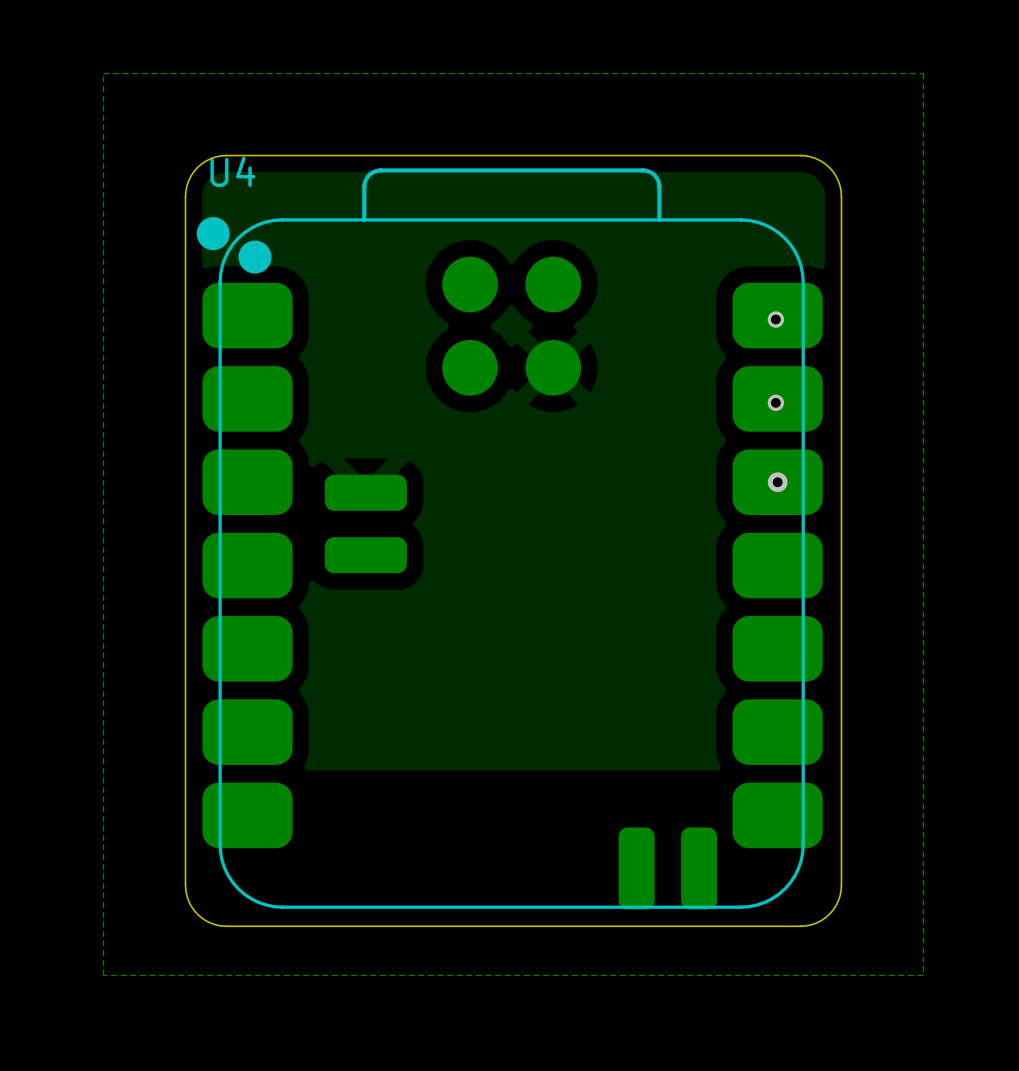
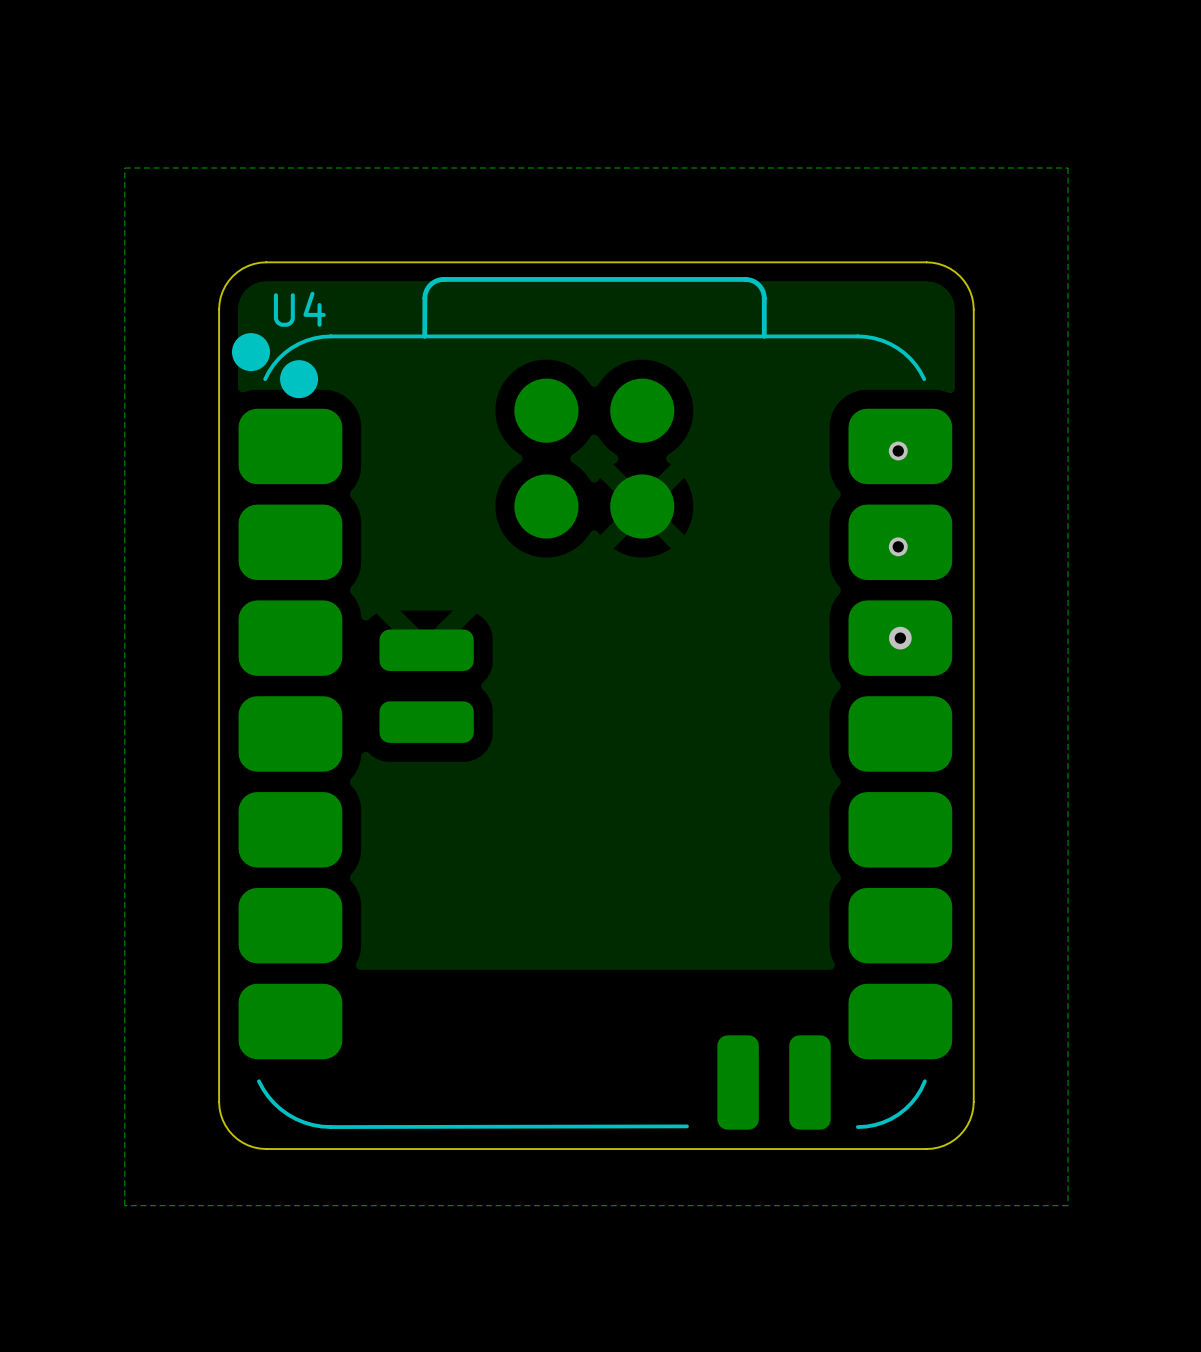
U4 footprint: [196, 168, 823, 910] -> [231, 277, 953, 1130]

